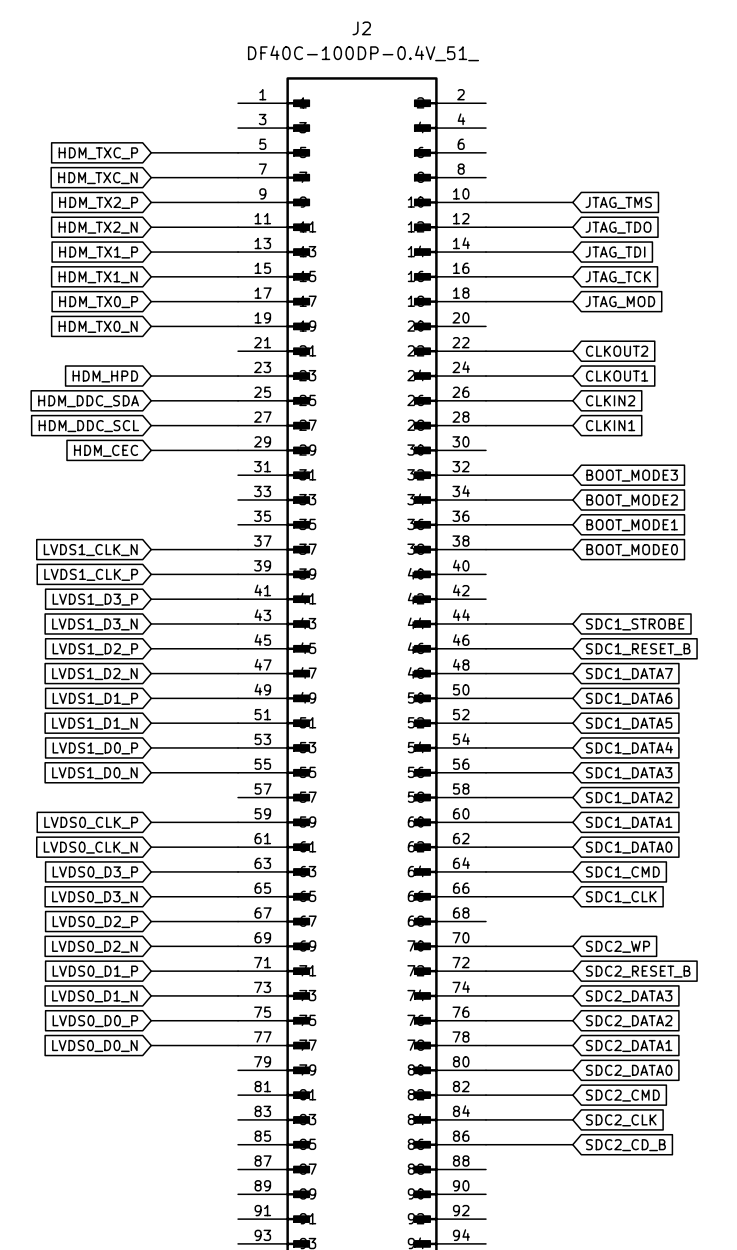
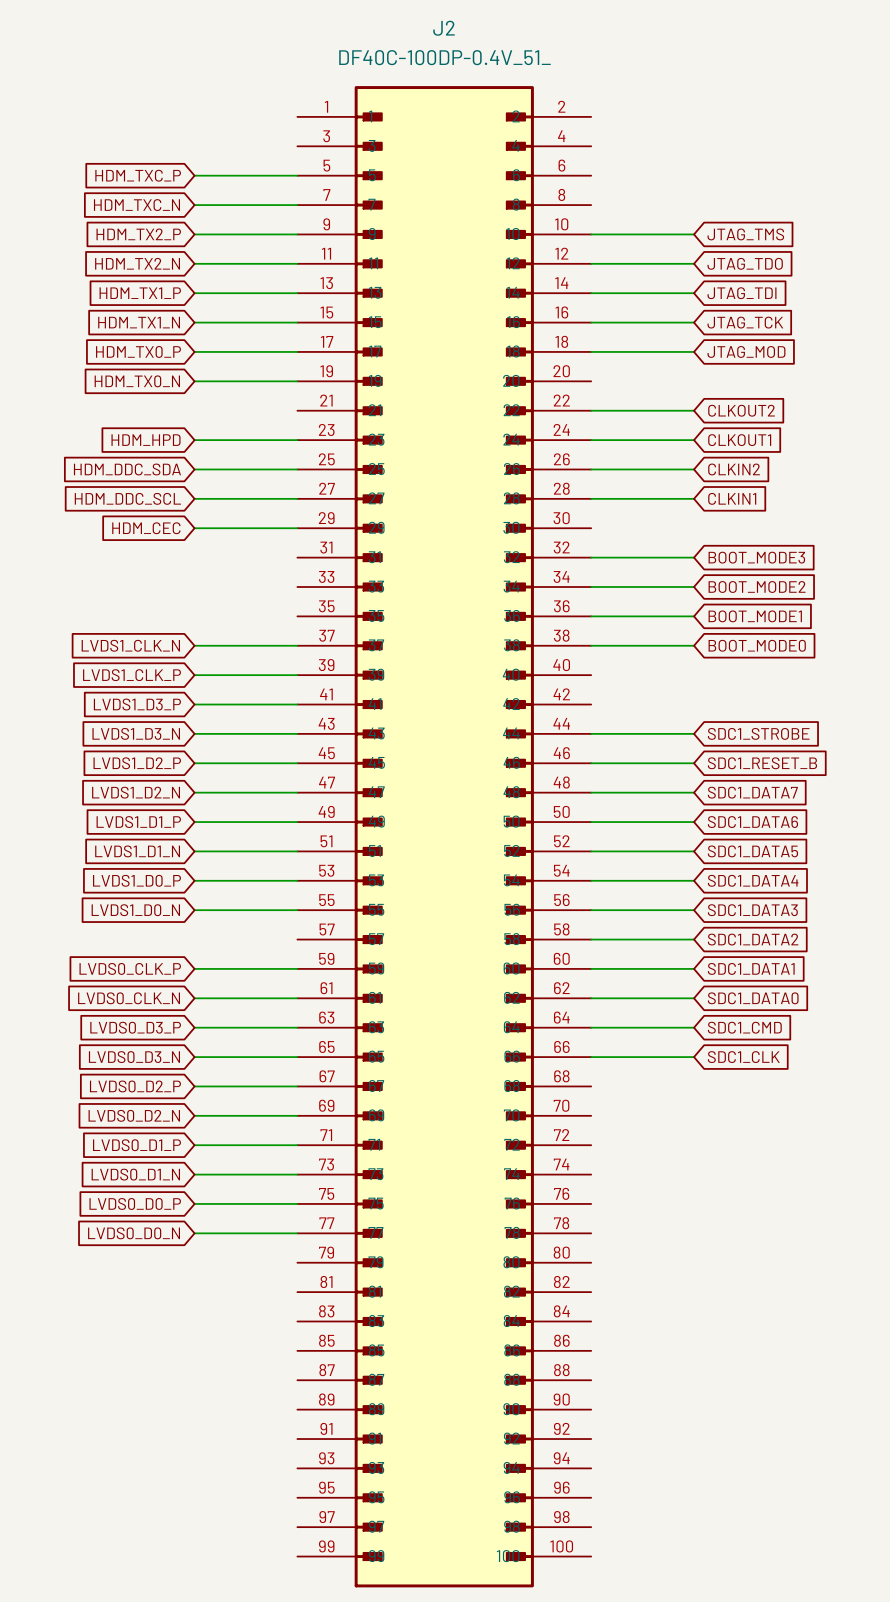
wire: (486, 946) (572, 946) -> none
global label: SDC2_WP (618, 946) -> none
wire: (486, 971) (572, 971) -> none
global label: SDC2_RESET_B (638, 971) -> none
wire: (486, 995) (572, 995) -> none
global label: SDC2_DATA3 (629, 996) -> none
wire: (486, 1020) (572, 1020) -> none
global label: SDC2_DATA2 (629, 1021) -> none
wire: (486, 1045) (572, 1045) -> none
global label: SDC2_DATA1 (629, 1045) -> none
wire: (486, 1070) (572, 1070) -> none
global label: SDC2_DATA0 (629, 1070) -> none
wire: (486, 1095) (572, 1095) -> none
global label: SDC2_CMD (622, 1095) -> none
wire: (486, 1119) (572, 1119) -> none
global label: SDC2_CLK (621, 1120) -> none
wire: (486, 1144) (572, 1144) -> none
global label: SDC2_CD_B (625, 1145) -> none

